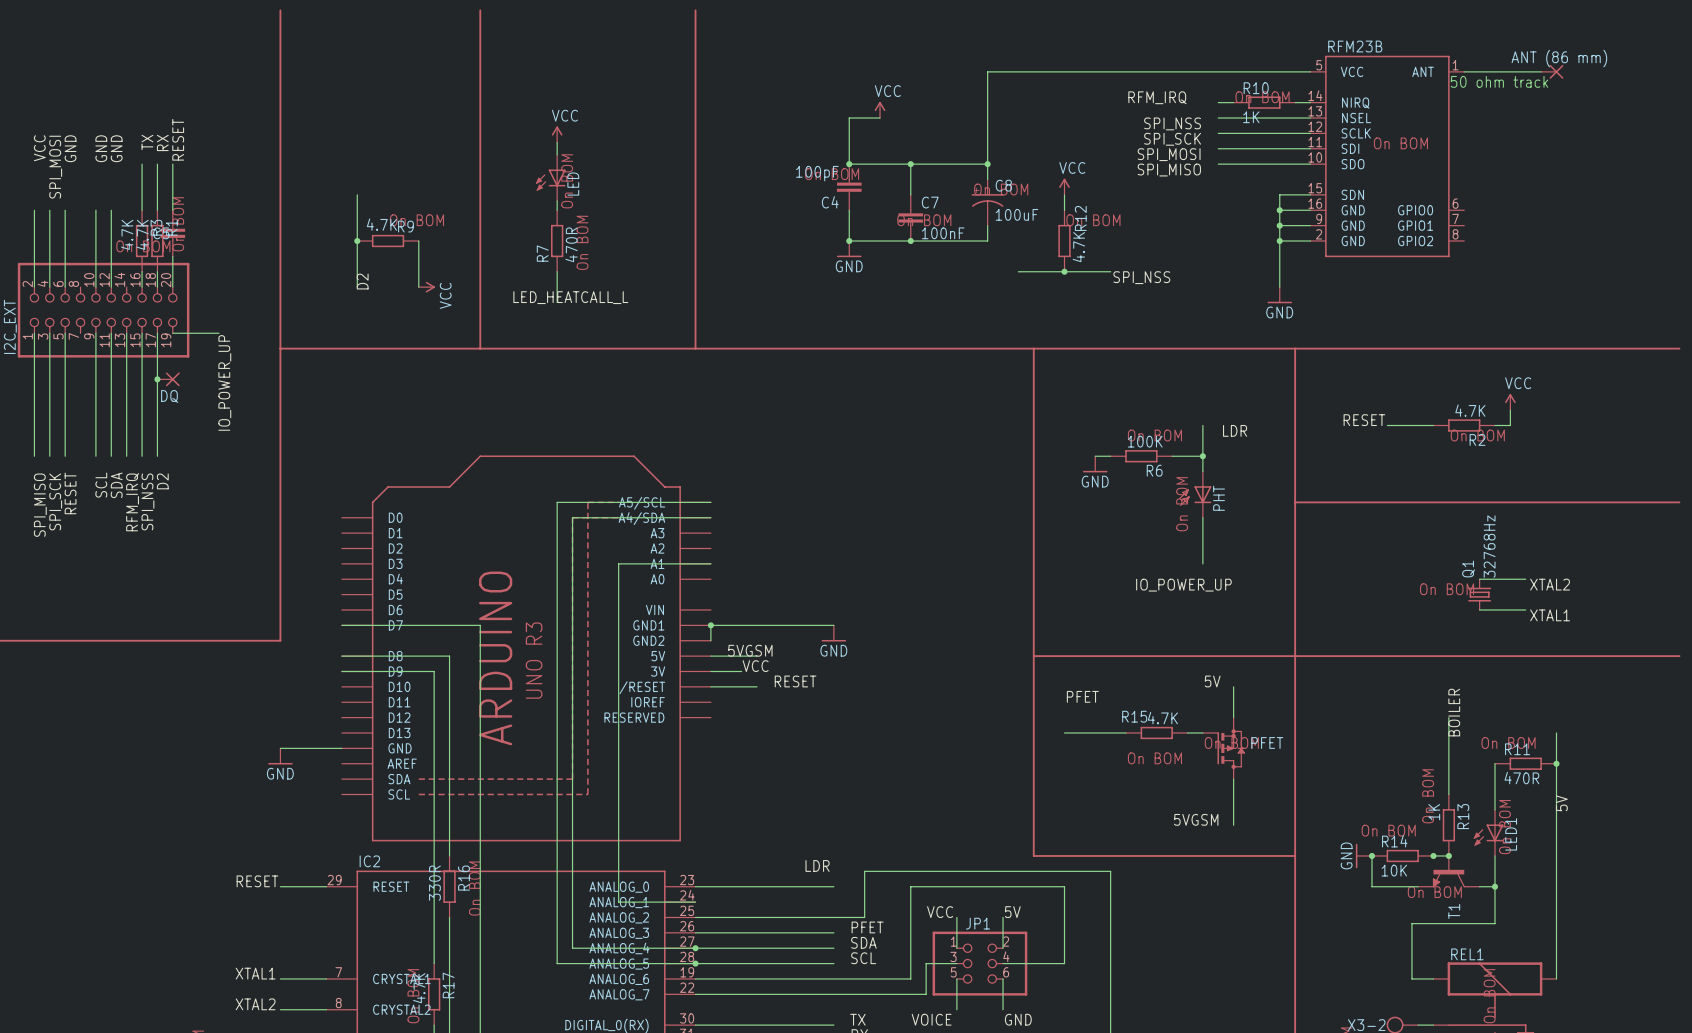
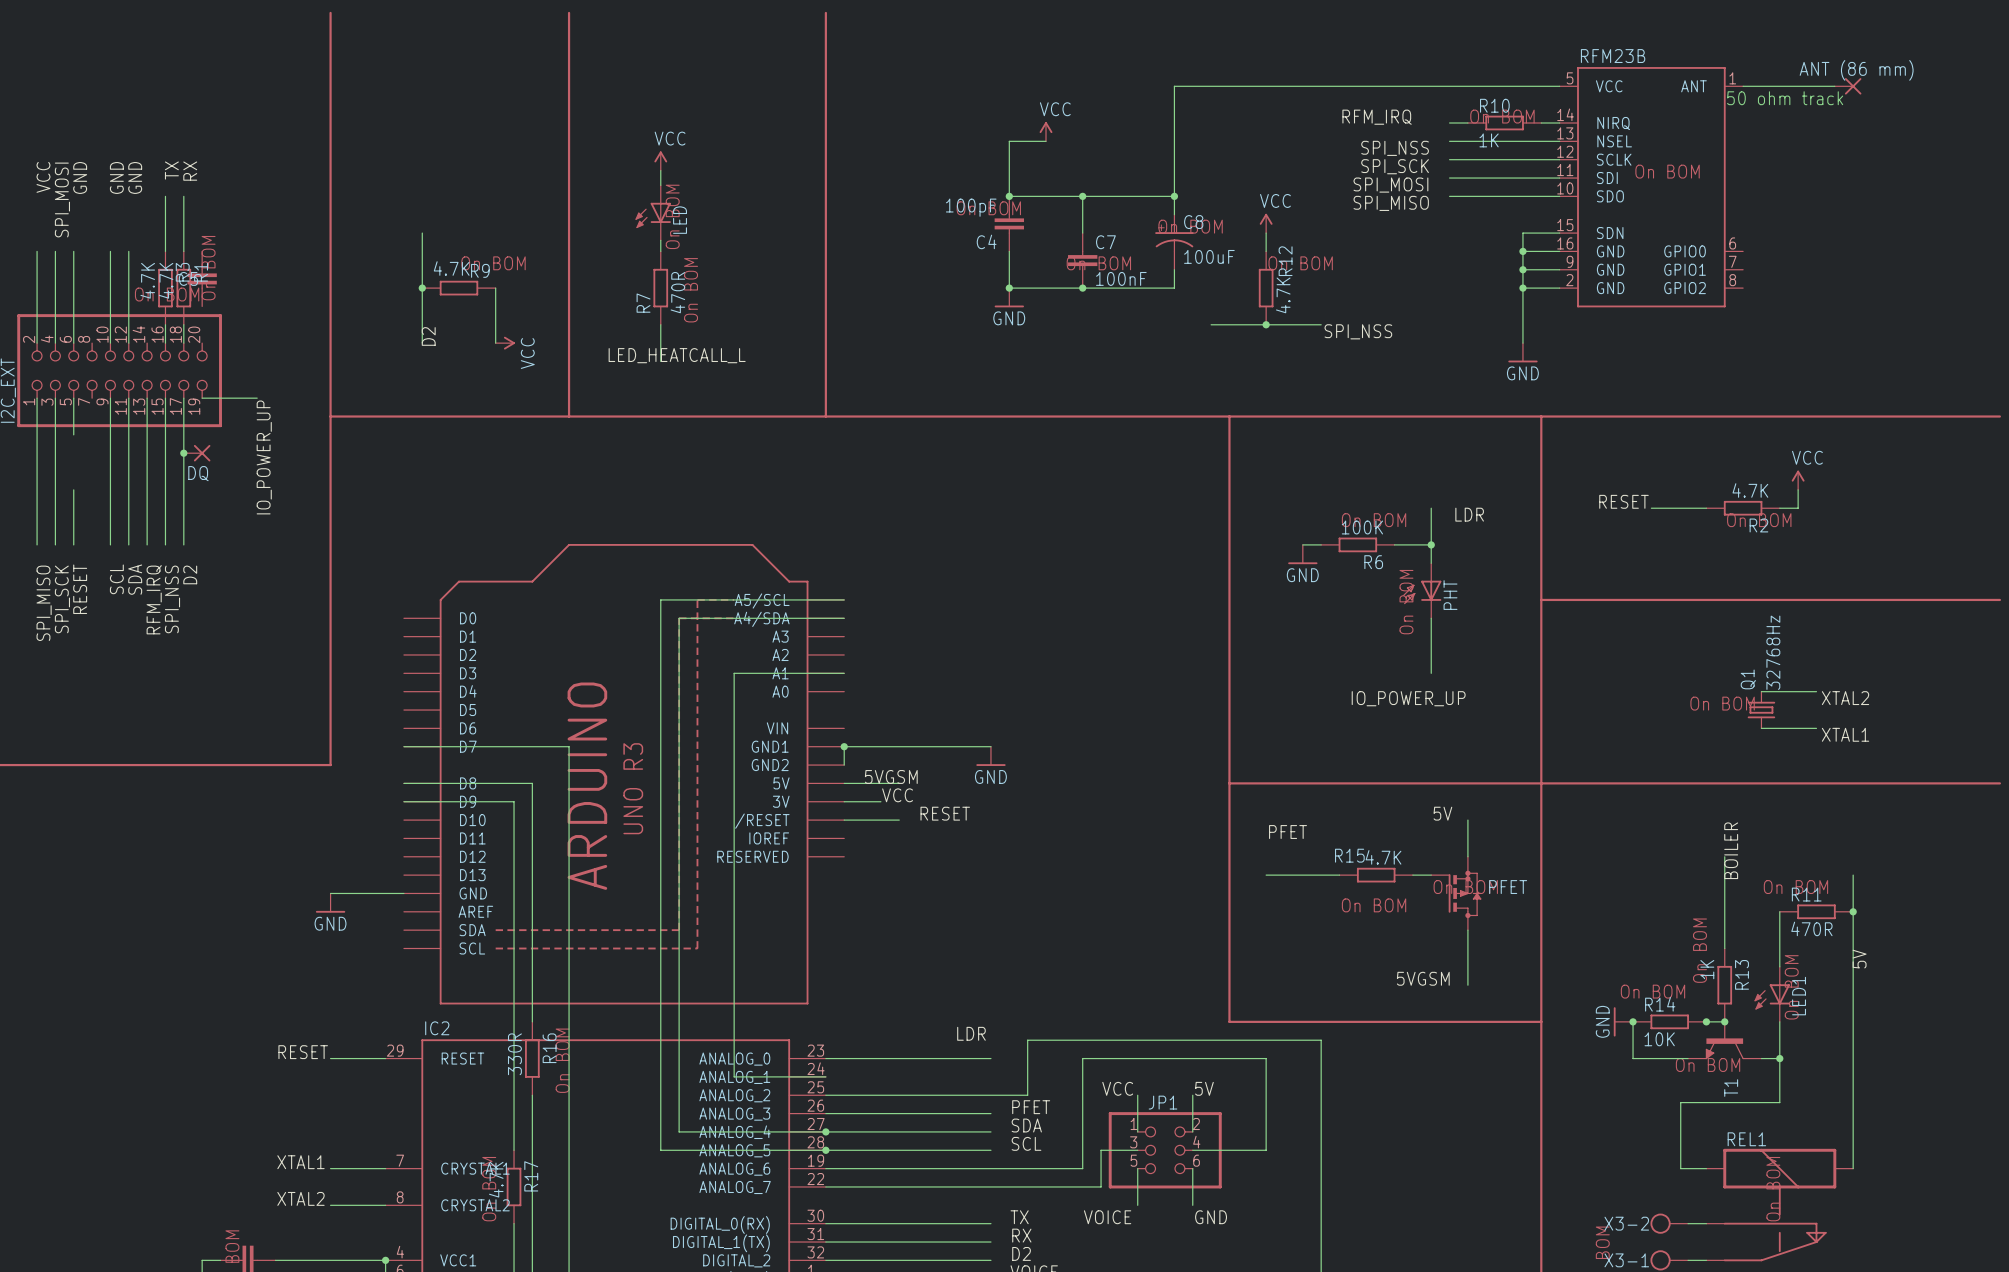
label: RESET (178, 139) -> none
wire: (172, 164) (172, 210) -> none
wire: (172, 256) (172, 287) -> none
wire: (65, 364) (65, 410) -> none

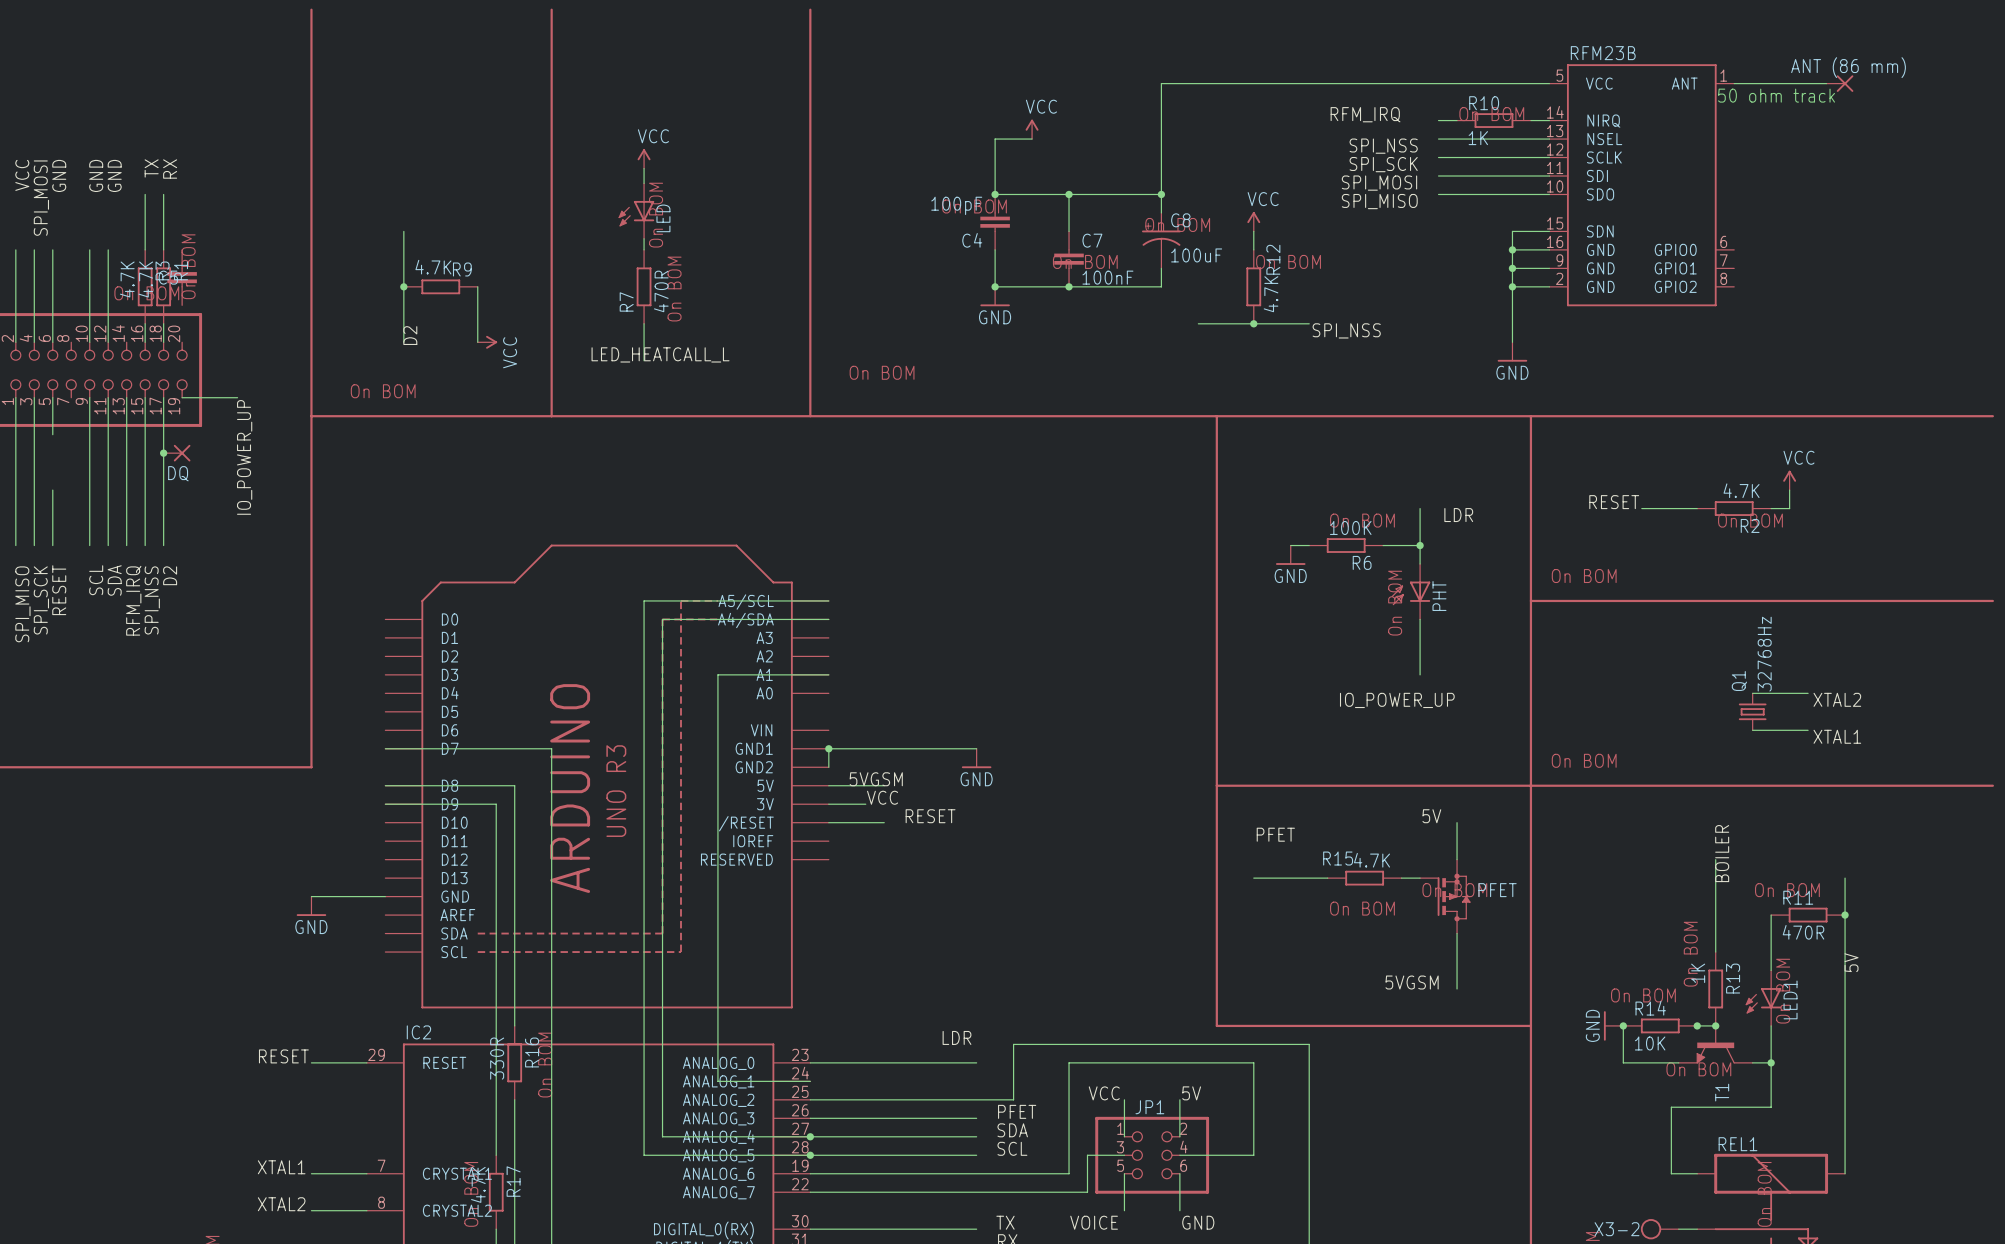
text: On BOM (1667, 171) -> none
text position: On BOM (493, 263) -> On BOM (383, 391)
text: none -> On BOM (882, 372)
text: none -> On BOM (1584, 576)
text: On BOM (1722, 703) -> none
text: none -> On BOM (1584, 760)

